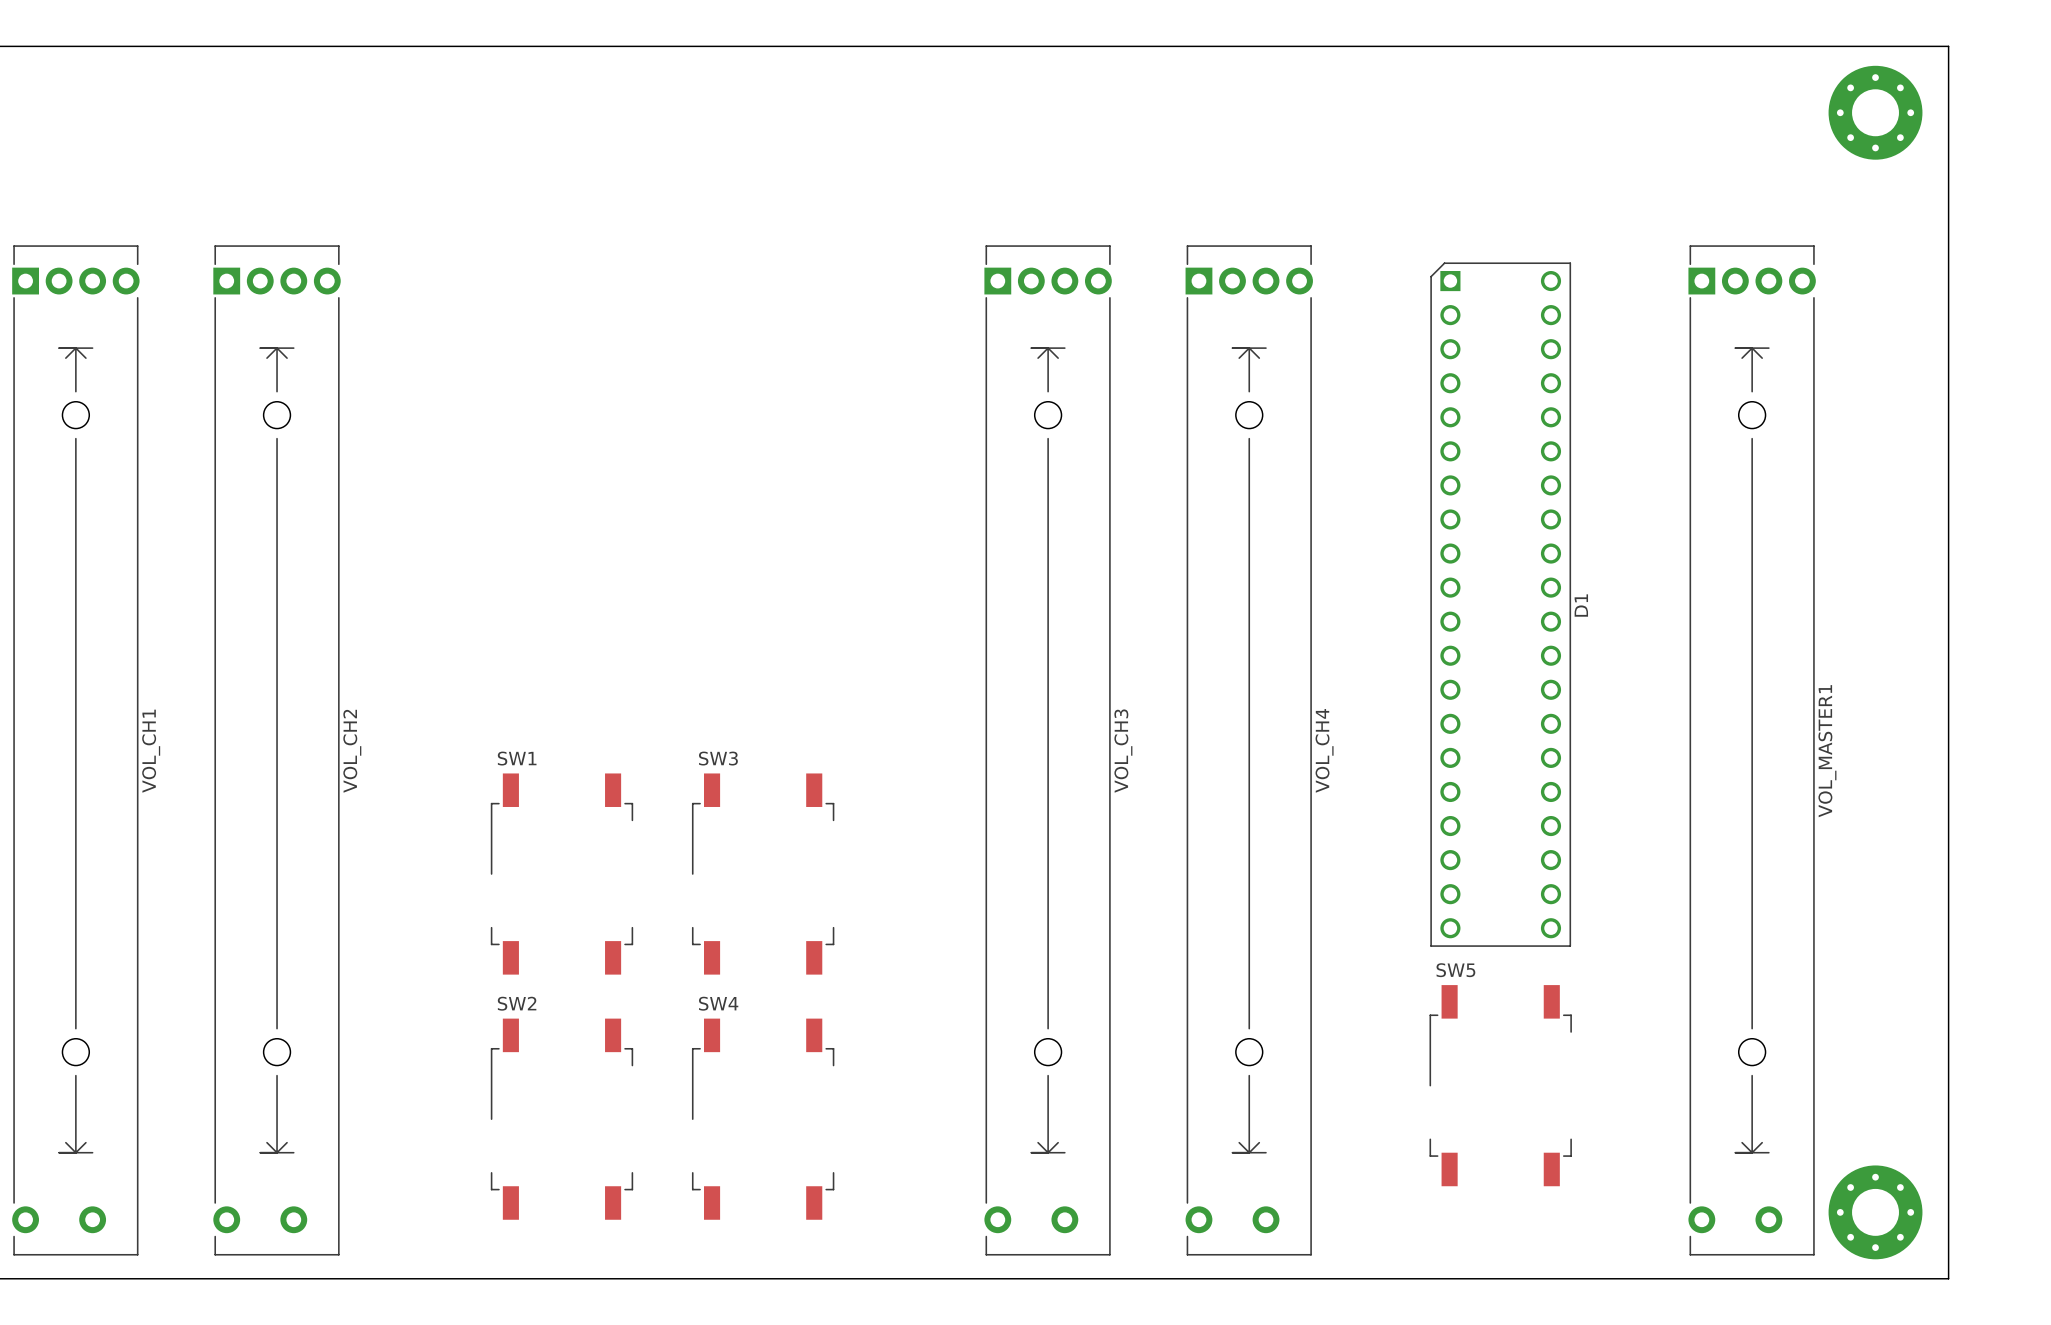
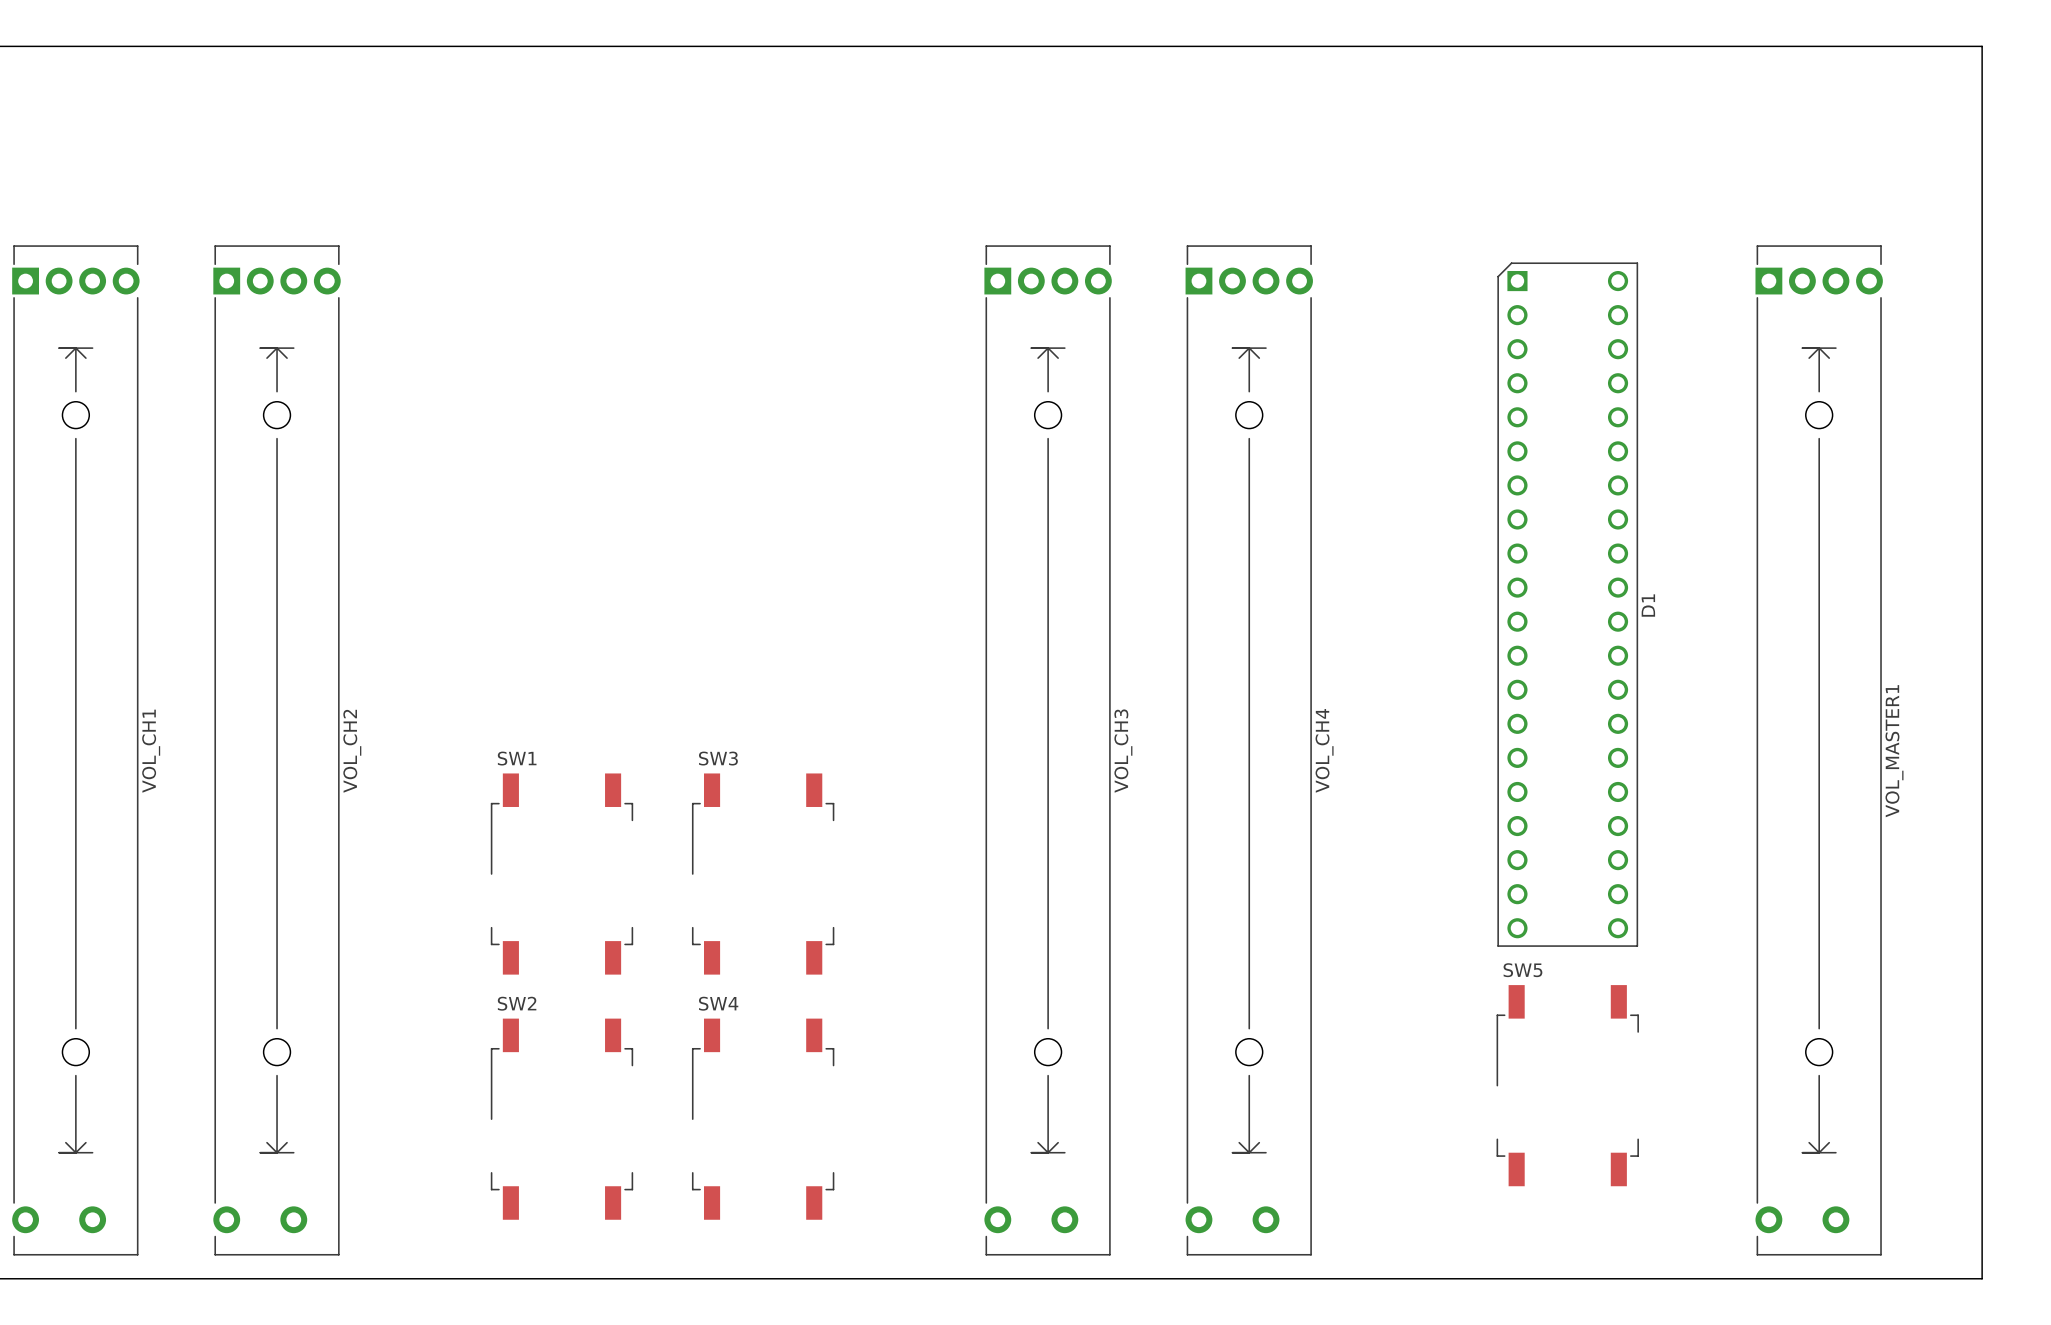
board edge: (1948, 46) (1948, 1278) -> (1948, 46) (1982, 46) (1982, 1278) (1948, 1278)
part: (1875, 112) -> none
D1 position: (1500, 604) -> (1567, 604)
VOL_MASTER1 position: (1752, 750) -> (1819, 750)
SW5 position: (1500, 1085) -> (1567, 1085)
part: (1875, 1212) -> none

